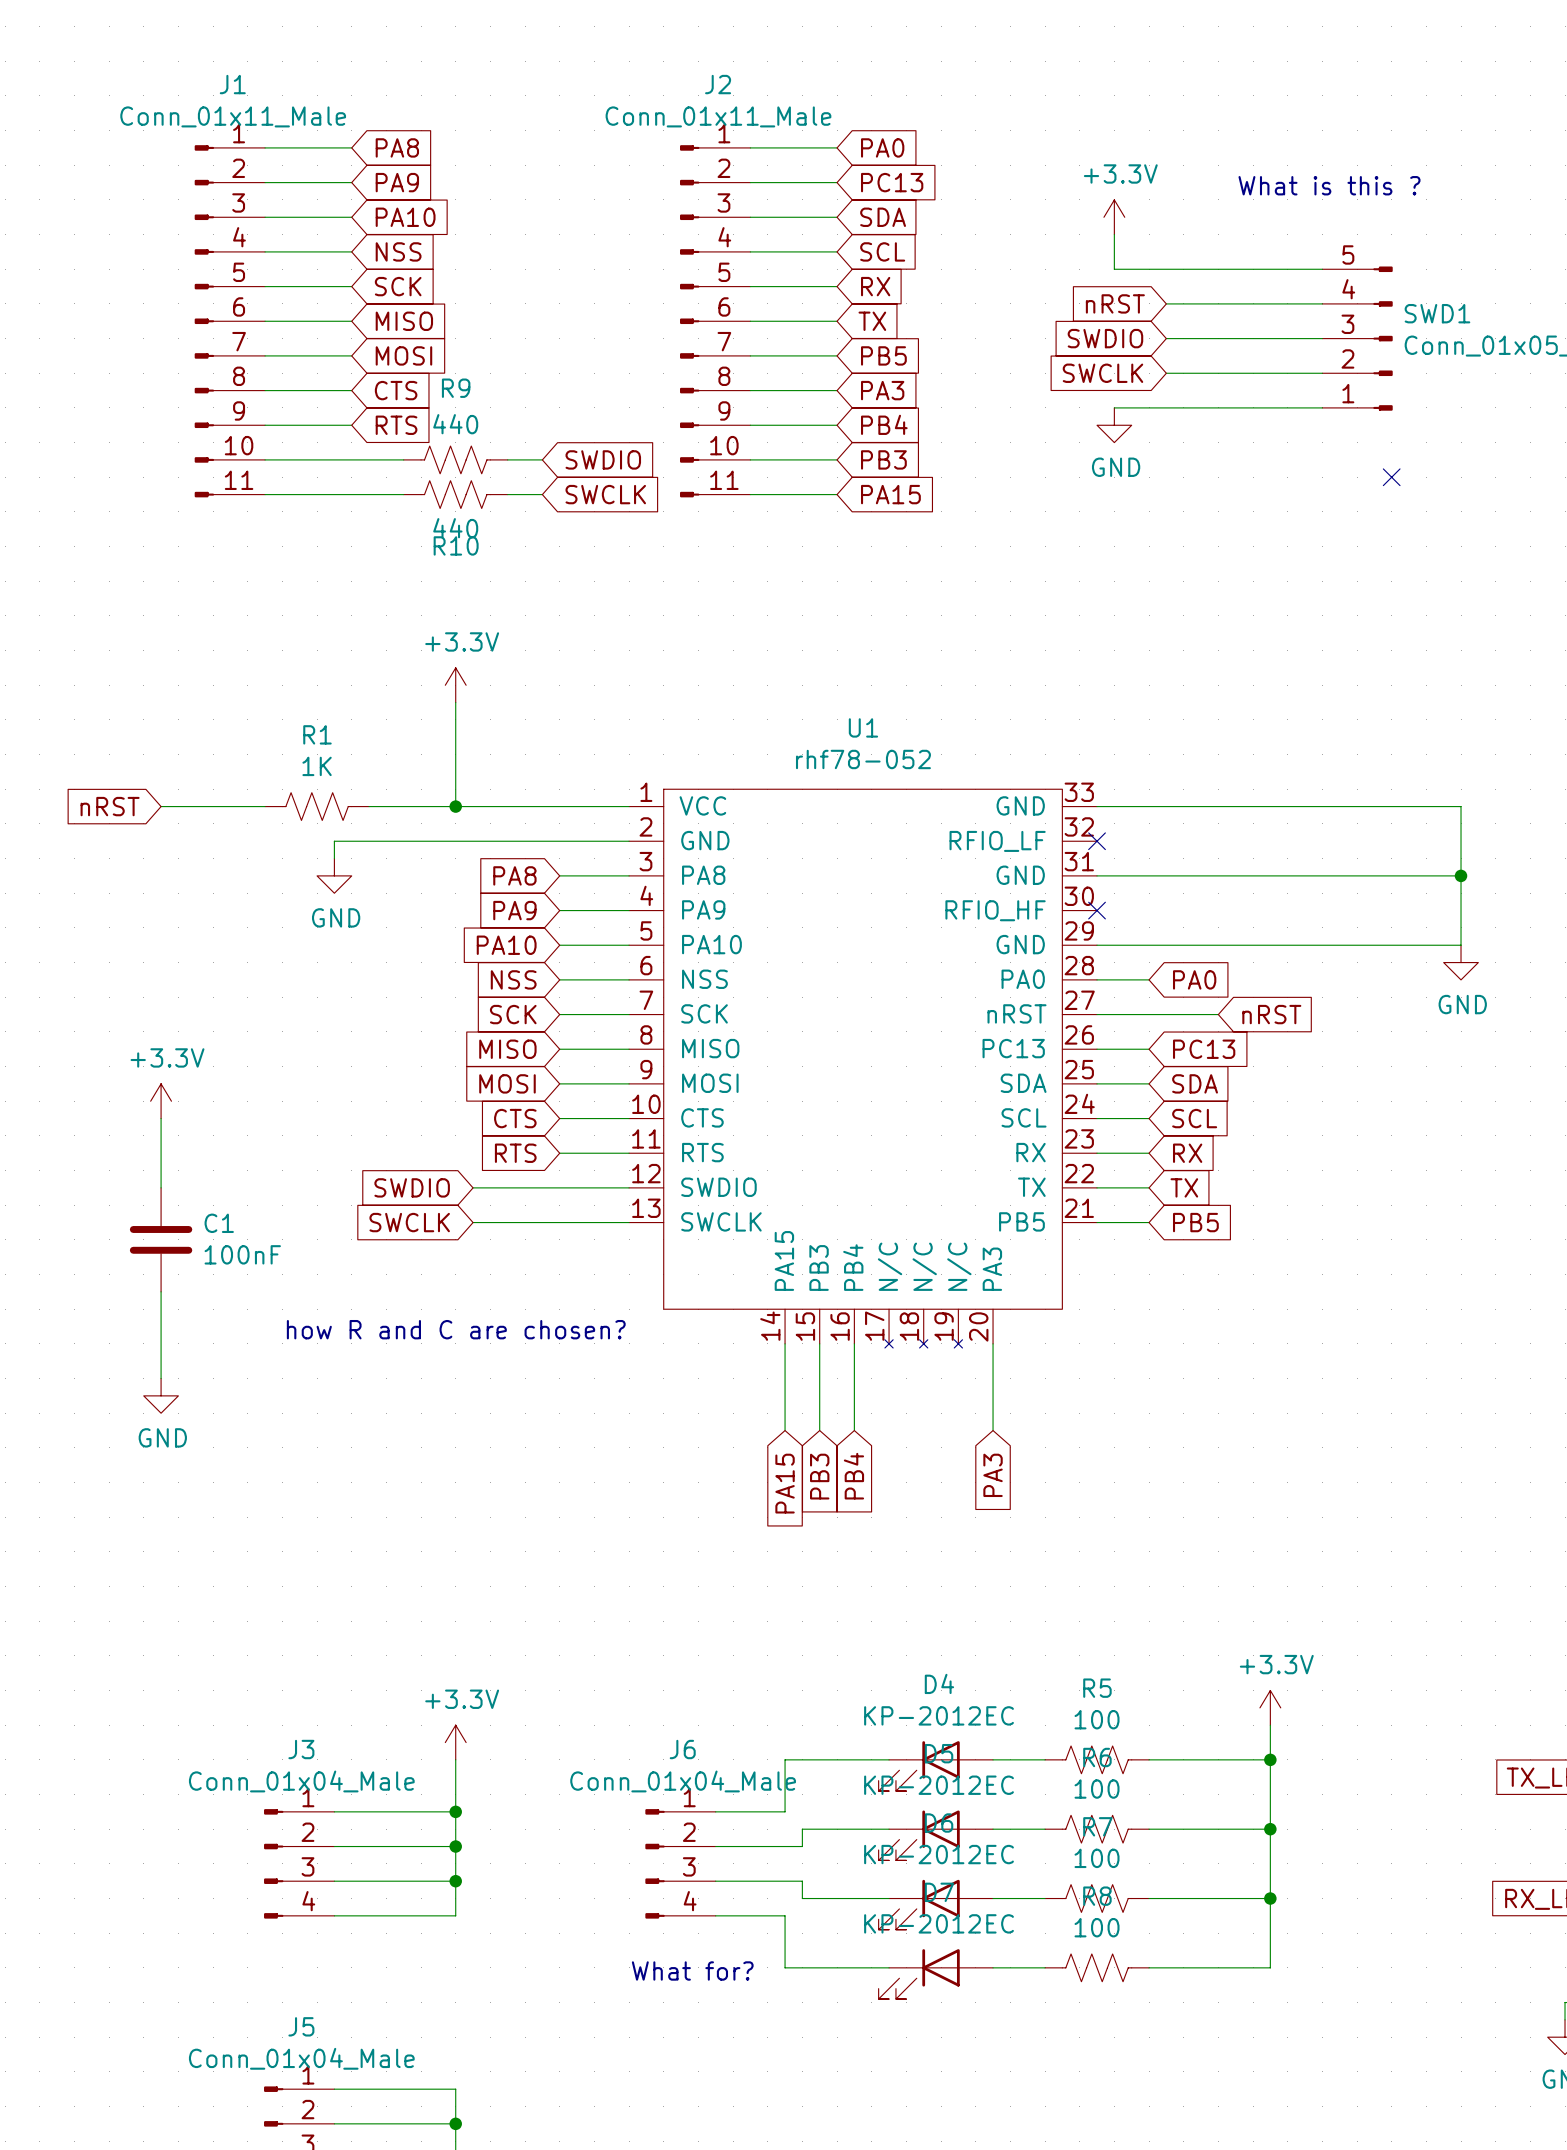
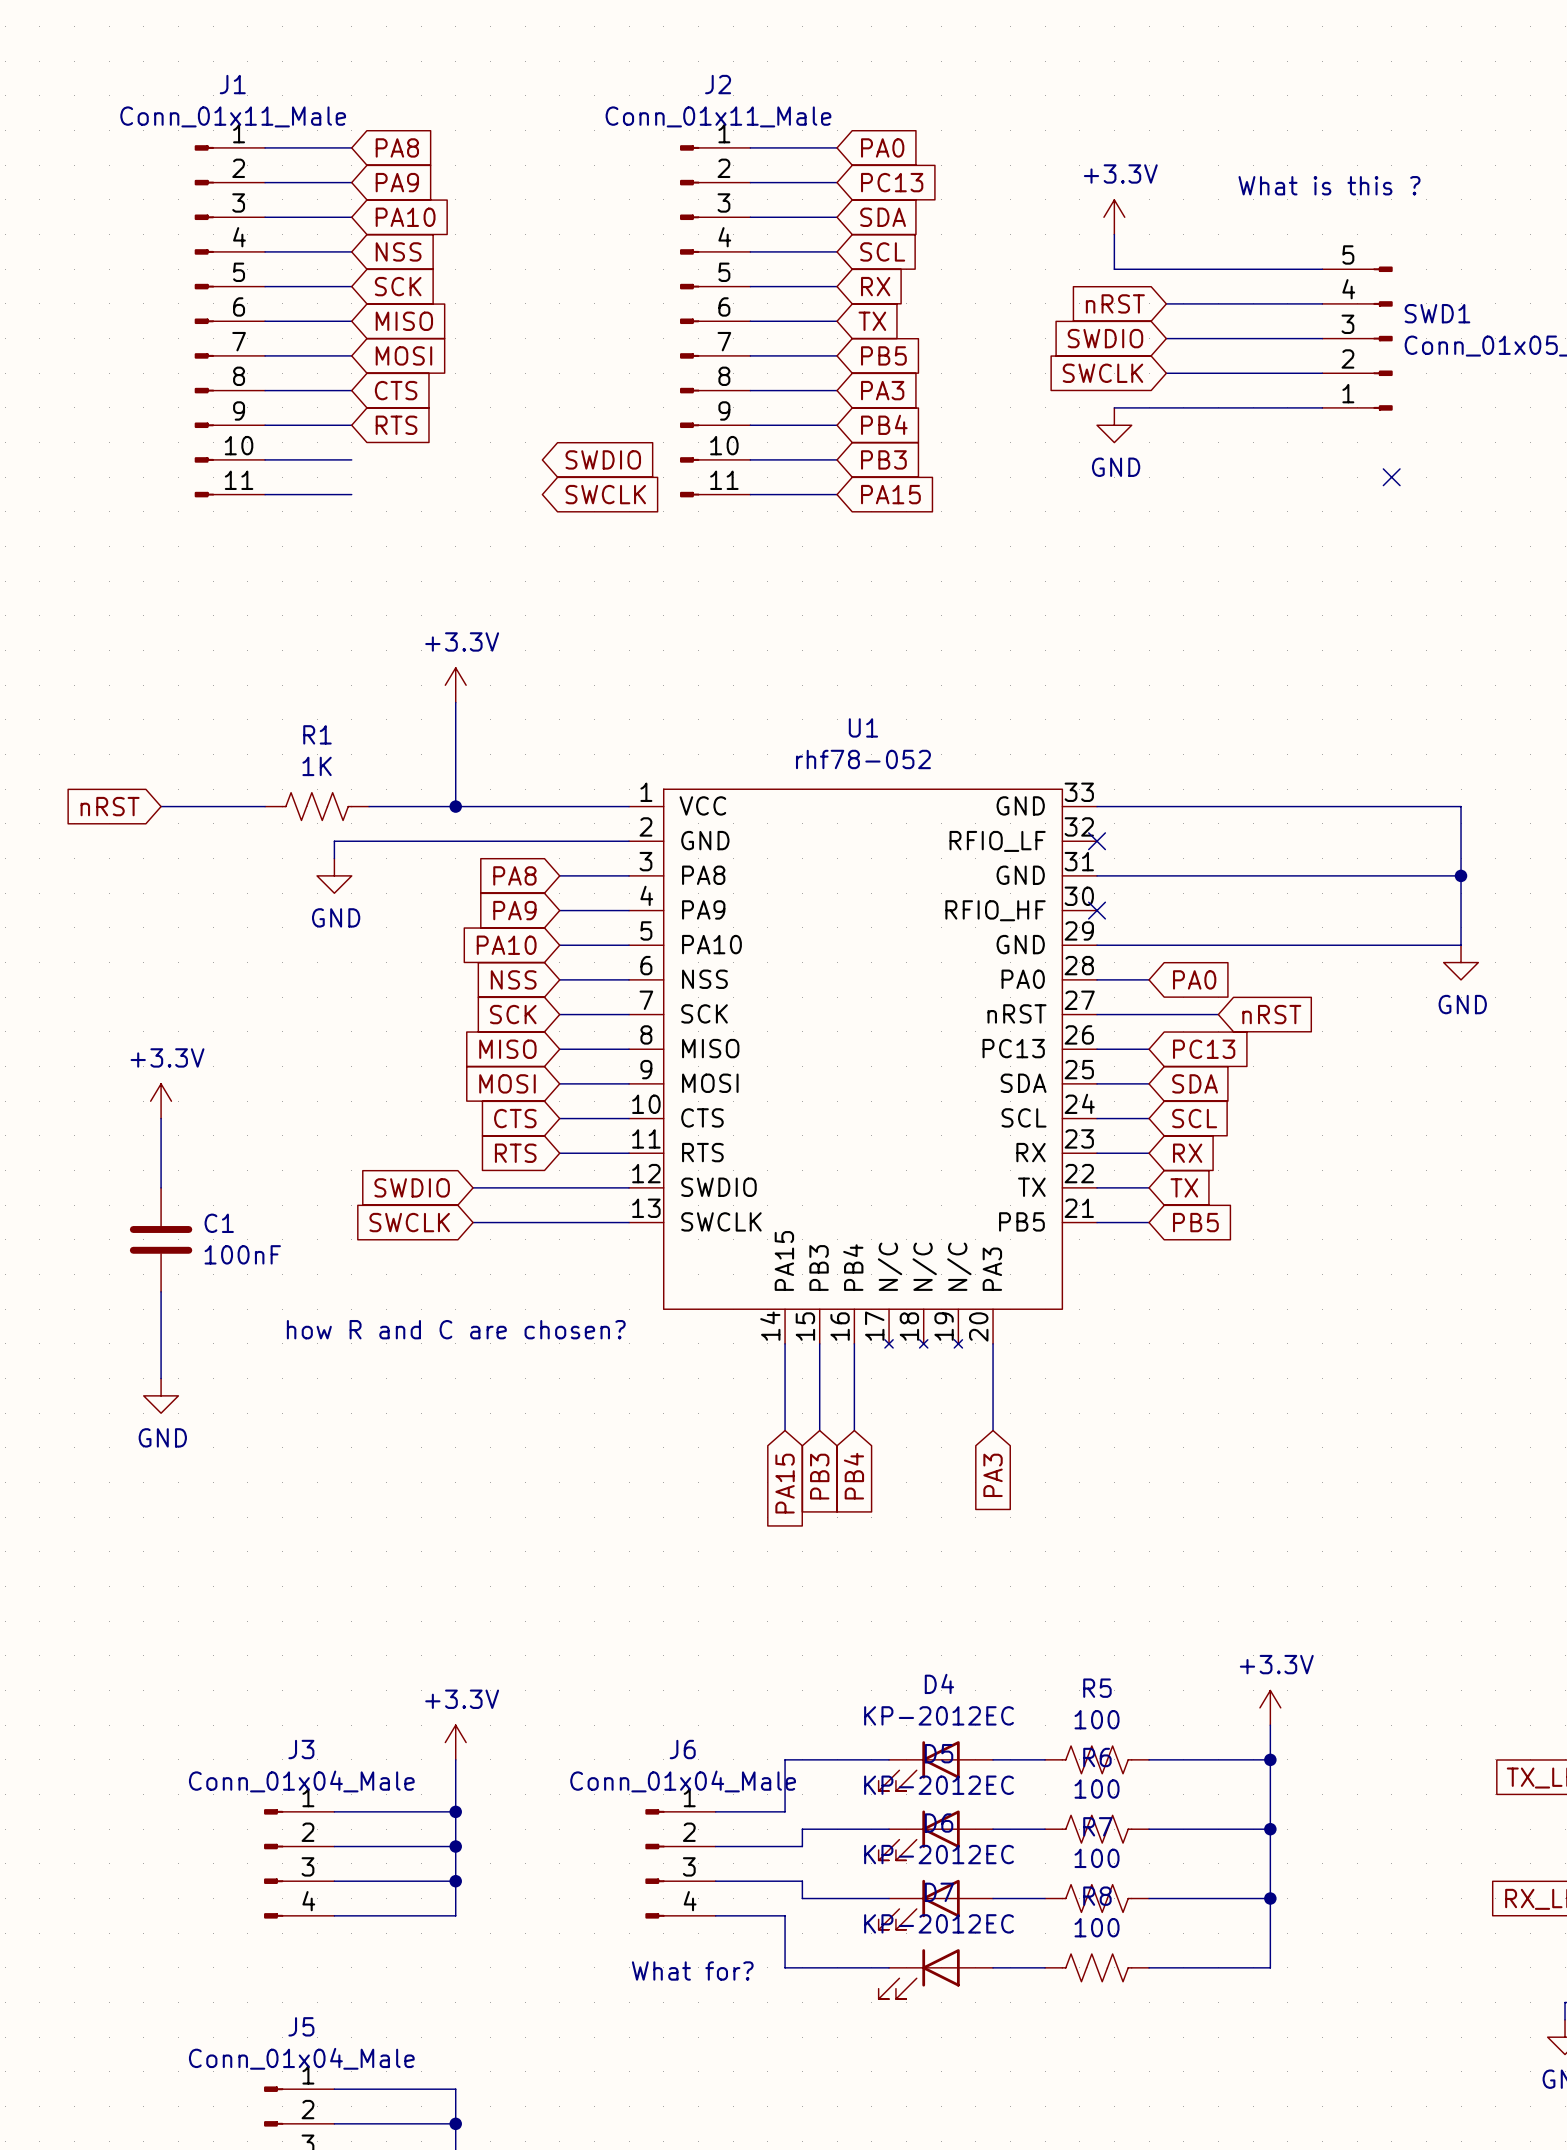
wire: (351, 459) (403, 459) -> none
R9: 440 (455, 459) -> none
wire: (507, 459) (542, 459) -> none
wire: (351, 494) (403, 494) -> none
R10: 440 (455, 494) -> none
wire: (507, 494) (542, 494) -> none

